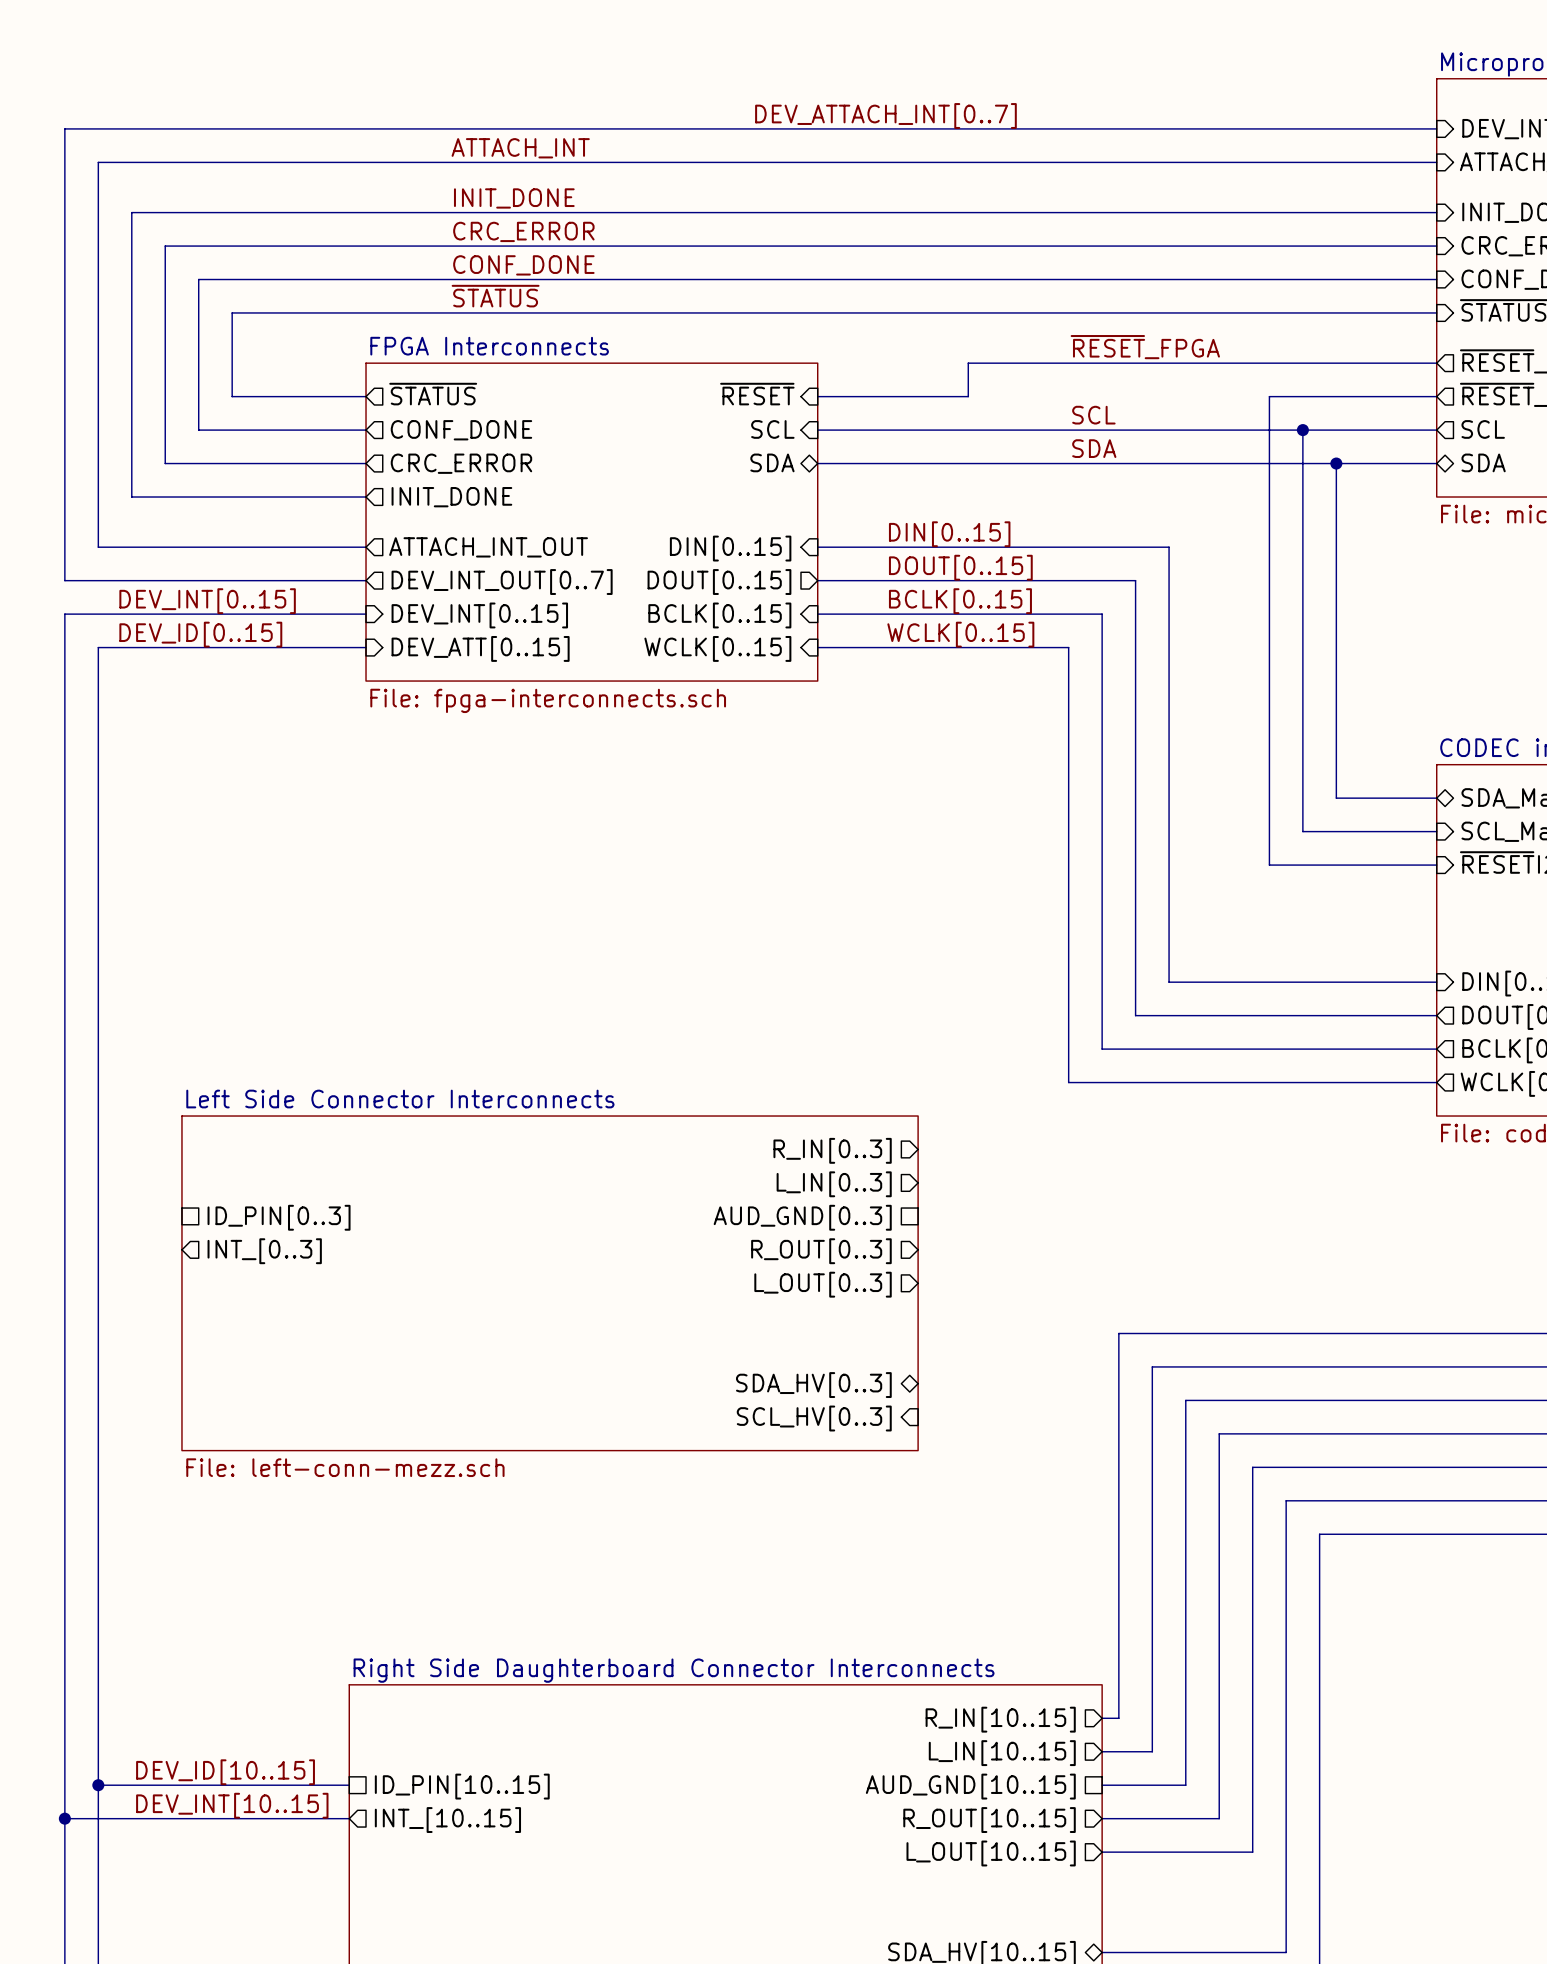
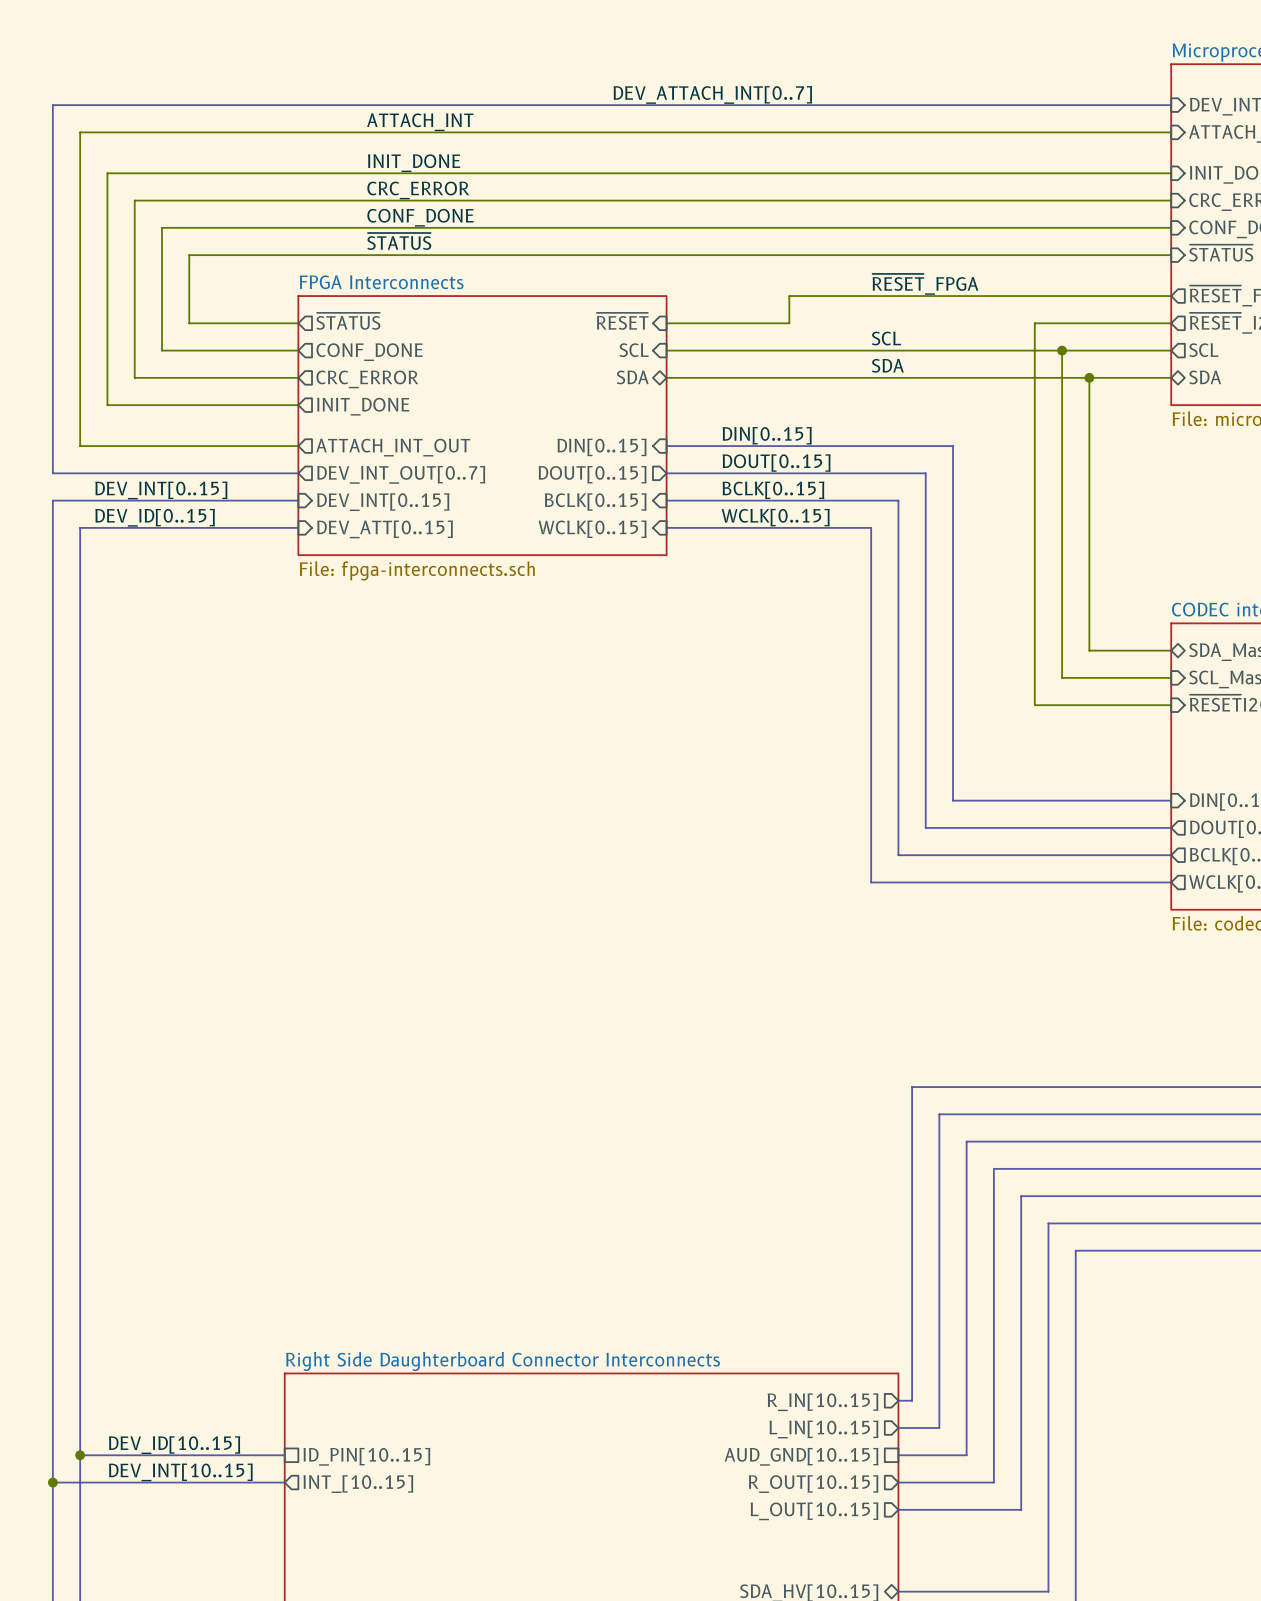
sheet pin: R_IN[0..3] (832, 1150) -> none
sheet pin: L_IN[0..3] (834, 1184) -> none
sheet pin: ID_PIN[0..3] (279, 1217) -> none
sheet pin: AUD_GND[0..3] (802, 1217) -> none
sheet pin: INT_[0..3] (264, 1251) -> none
sheet pin: R_OUT[0..3] (821, 1251) -> none
sheet Left Side Connector Interconnects: File: left-conn-mezz.sch (550, 1283) -> none
sheet pin: L_OUT[0..3] (823, 1284) -> none
sheet pin: SDA_HV[0..3] (813, 1385) -> none
sheet pin: SCL_HV[0..3] (814, 1418) -> none

